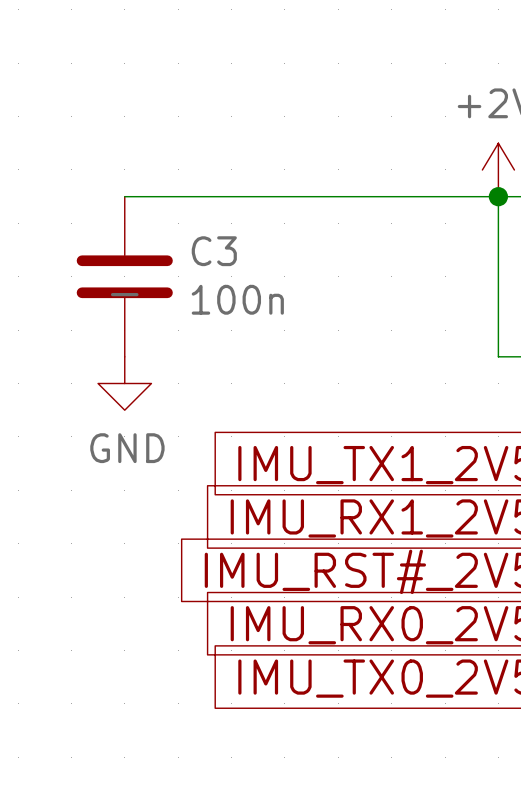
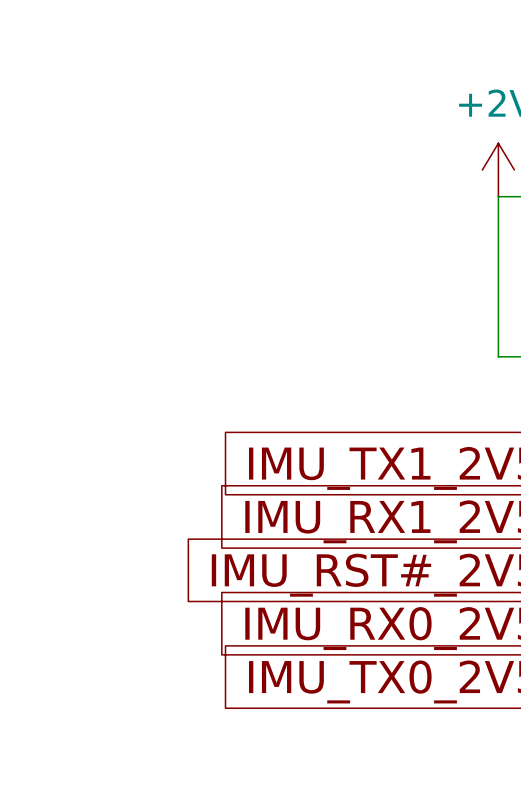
wire: (124, 196) (498, 196) -> none
junction: (498, 196) -> none
C3: 100n (124, 276) -> none
power symbol: GND (124, 383) -> none

